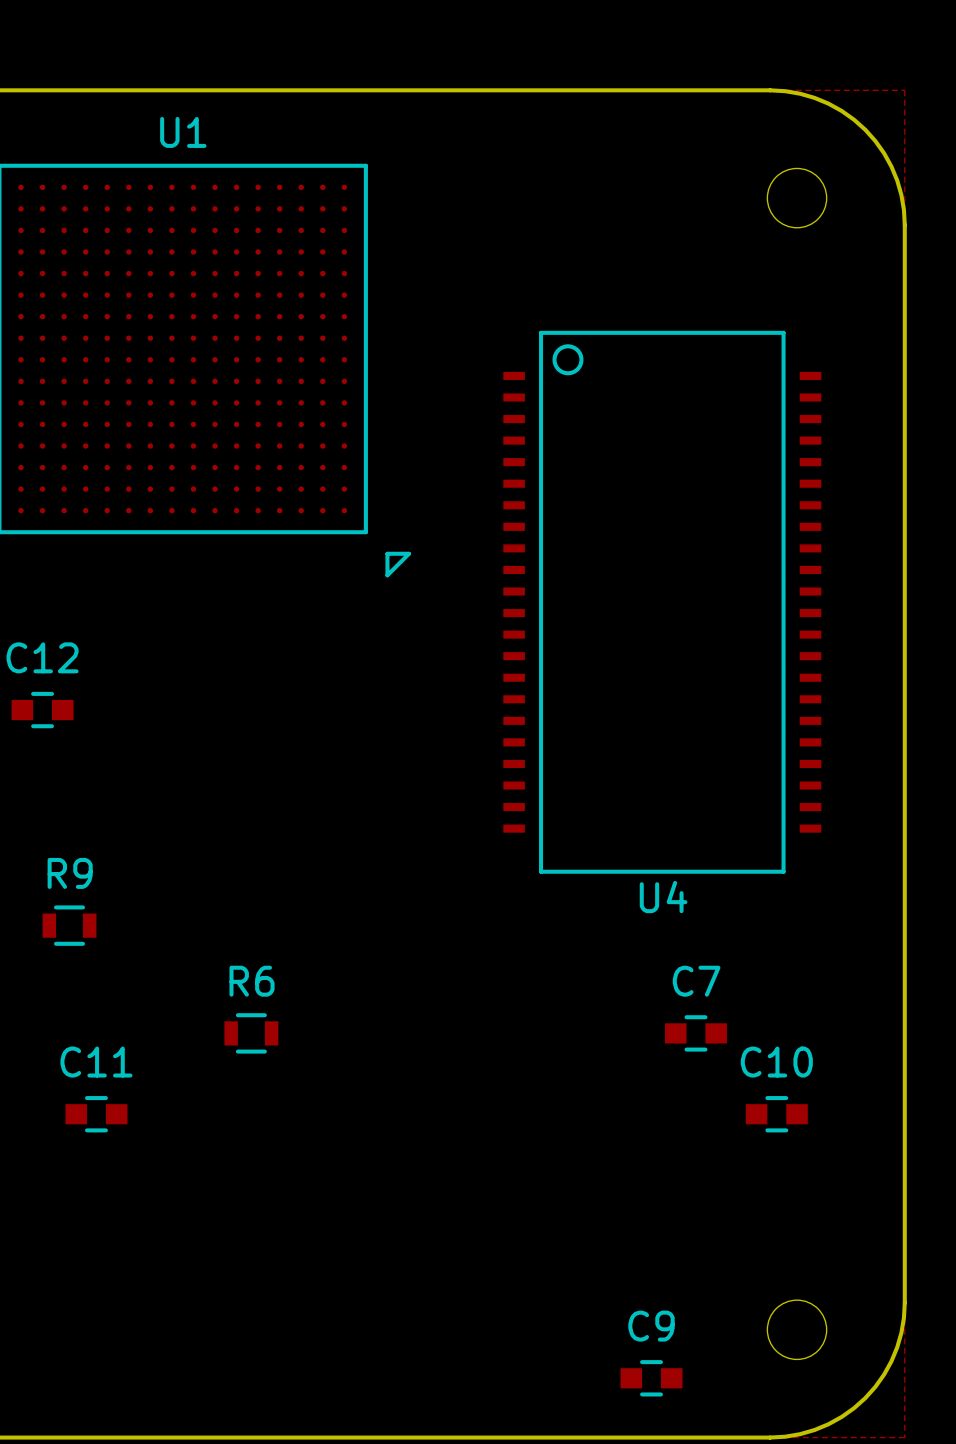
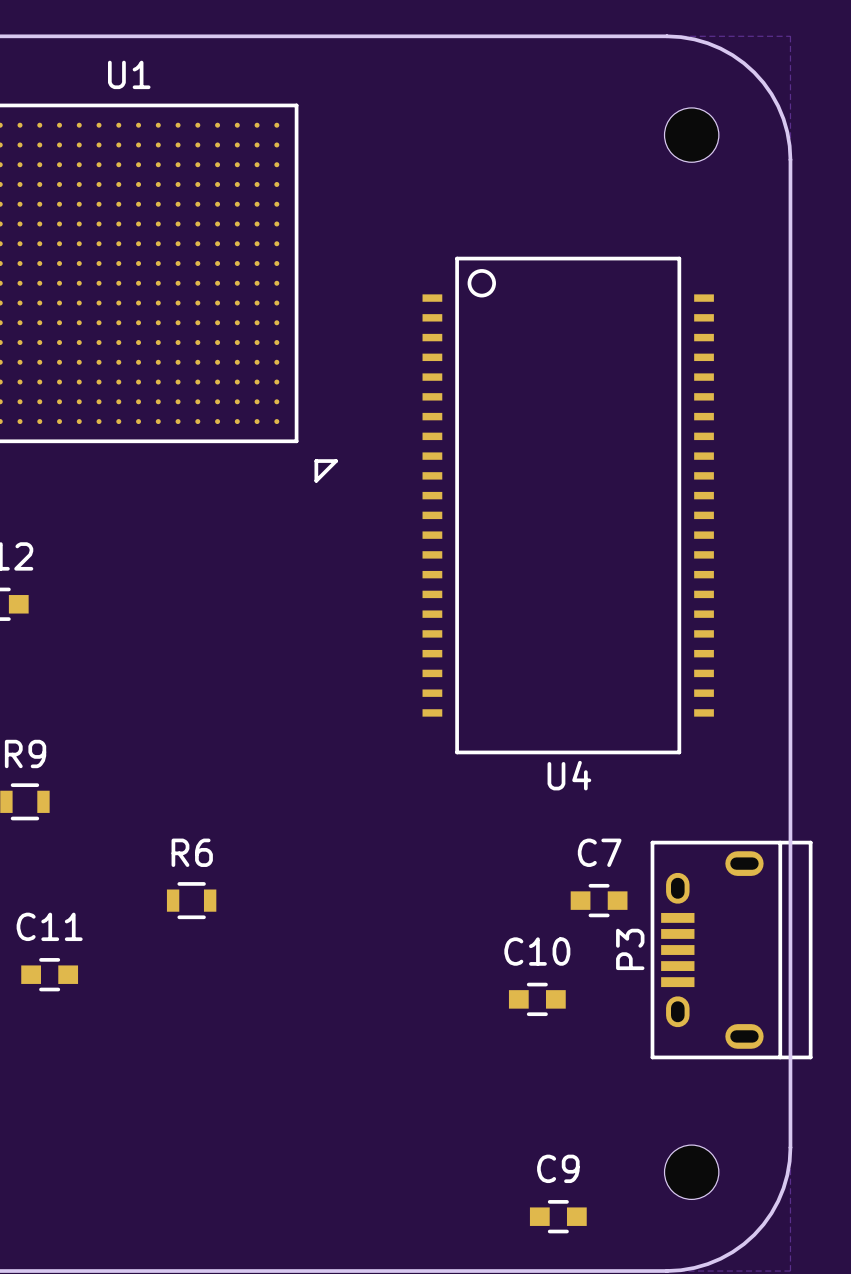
P3: none -> (731, 950)
C10 position: (776, 1114) -> (537, 999)

